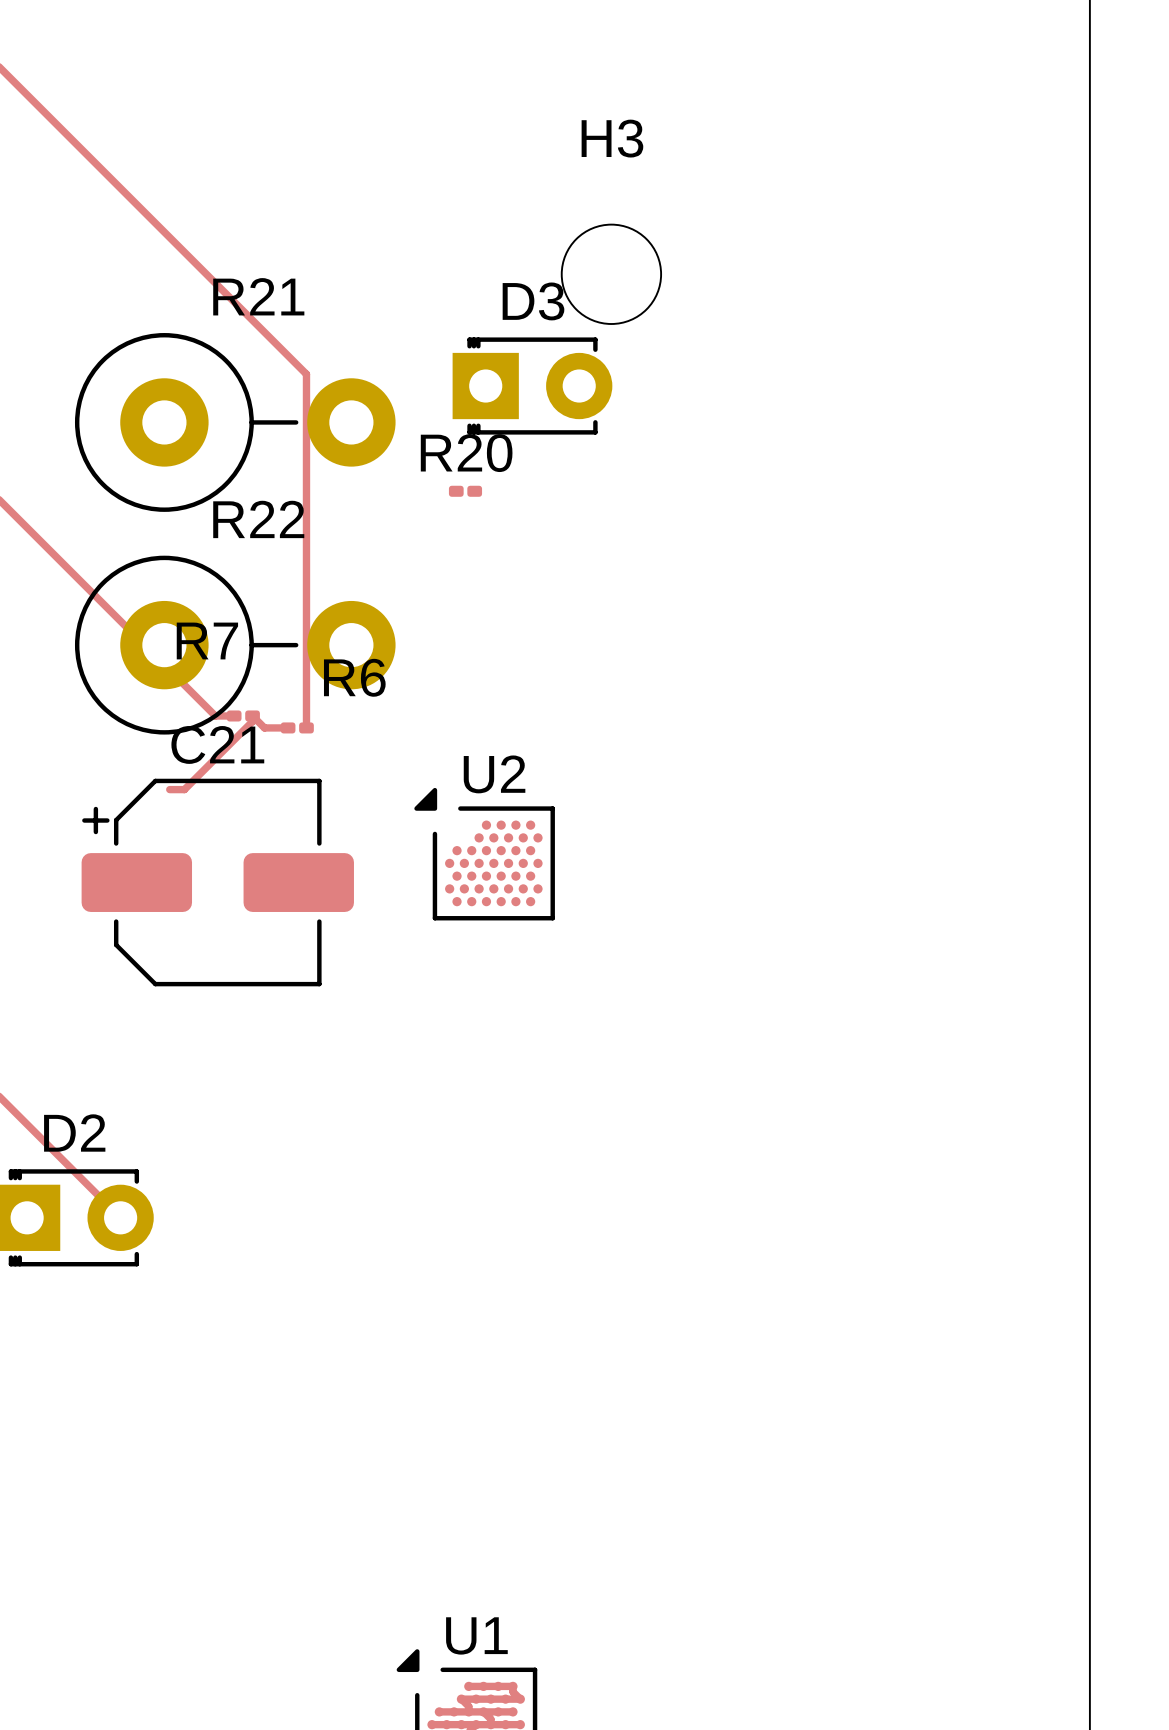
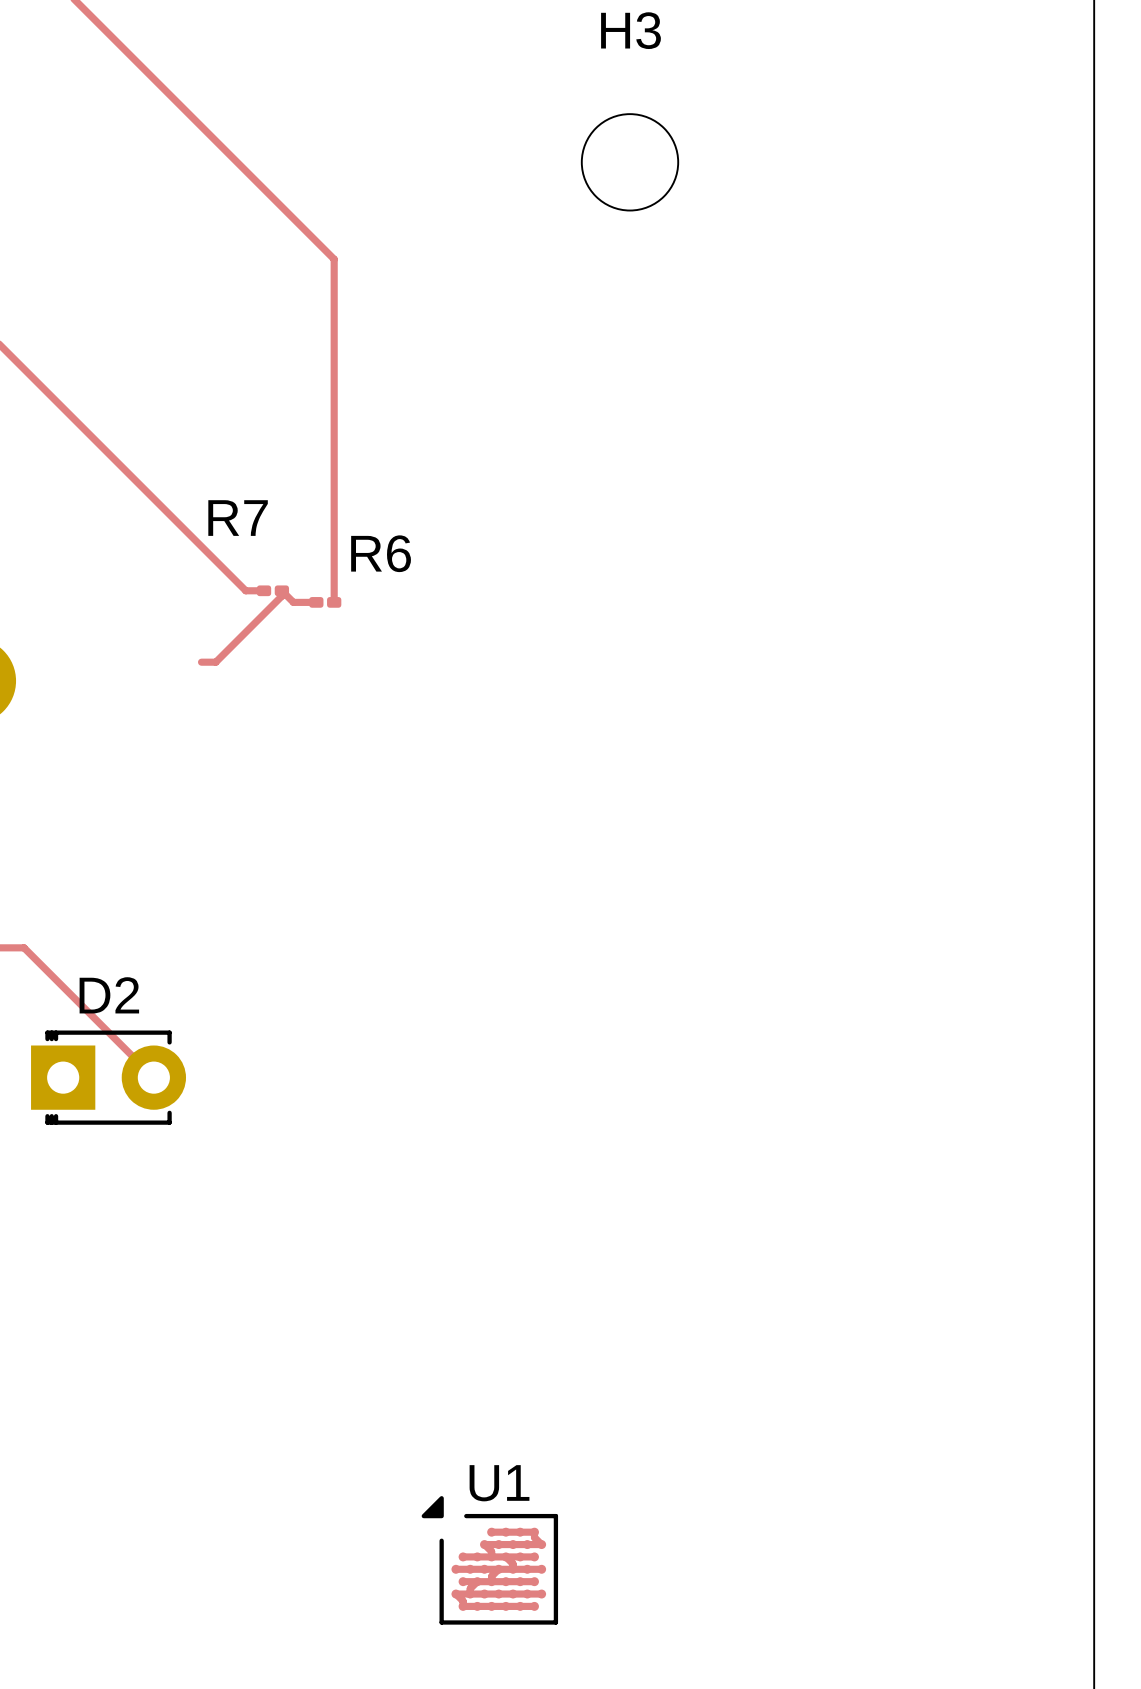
D3: (532, 386) -> none
R21: (235, 422) -> none
R20: (465, 491) -> none
R22: (235, 645) -> none
U2: (484, 854) -> none
C21: (217, 882) -> none

